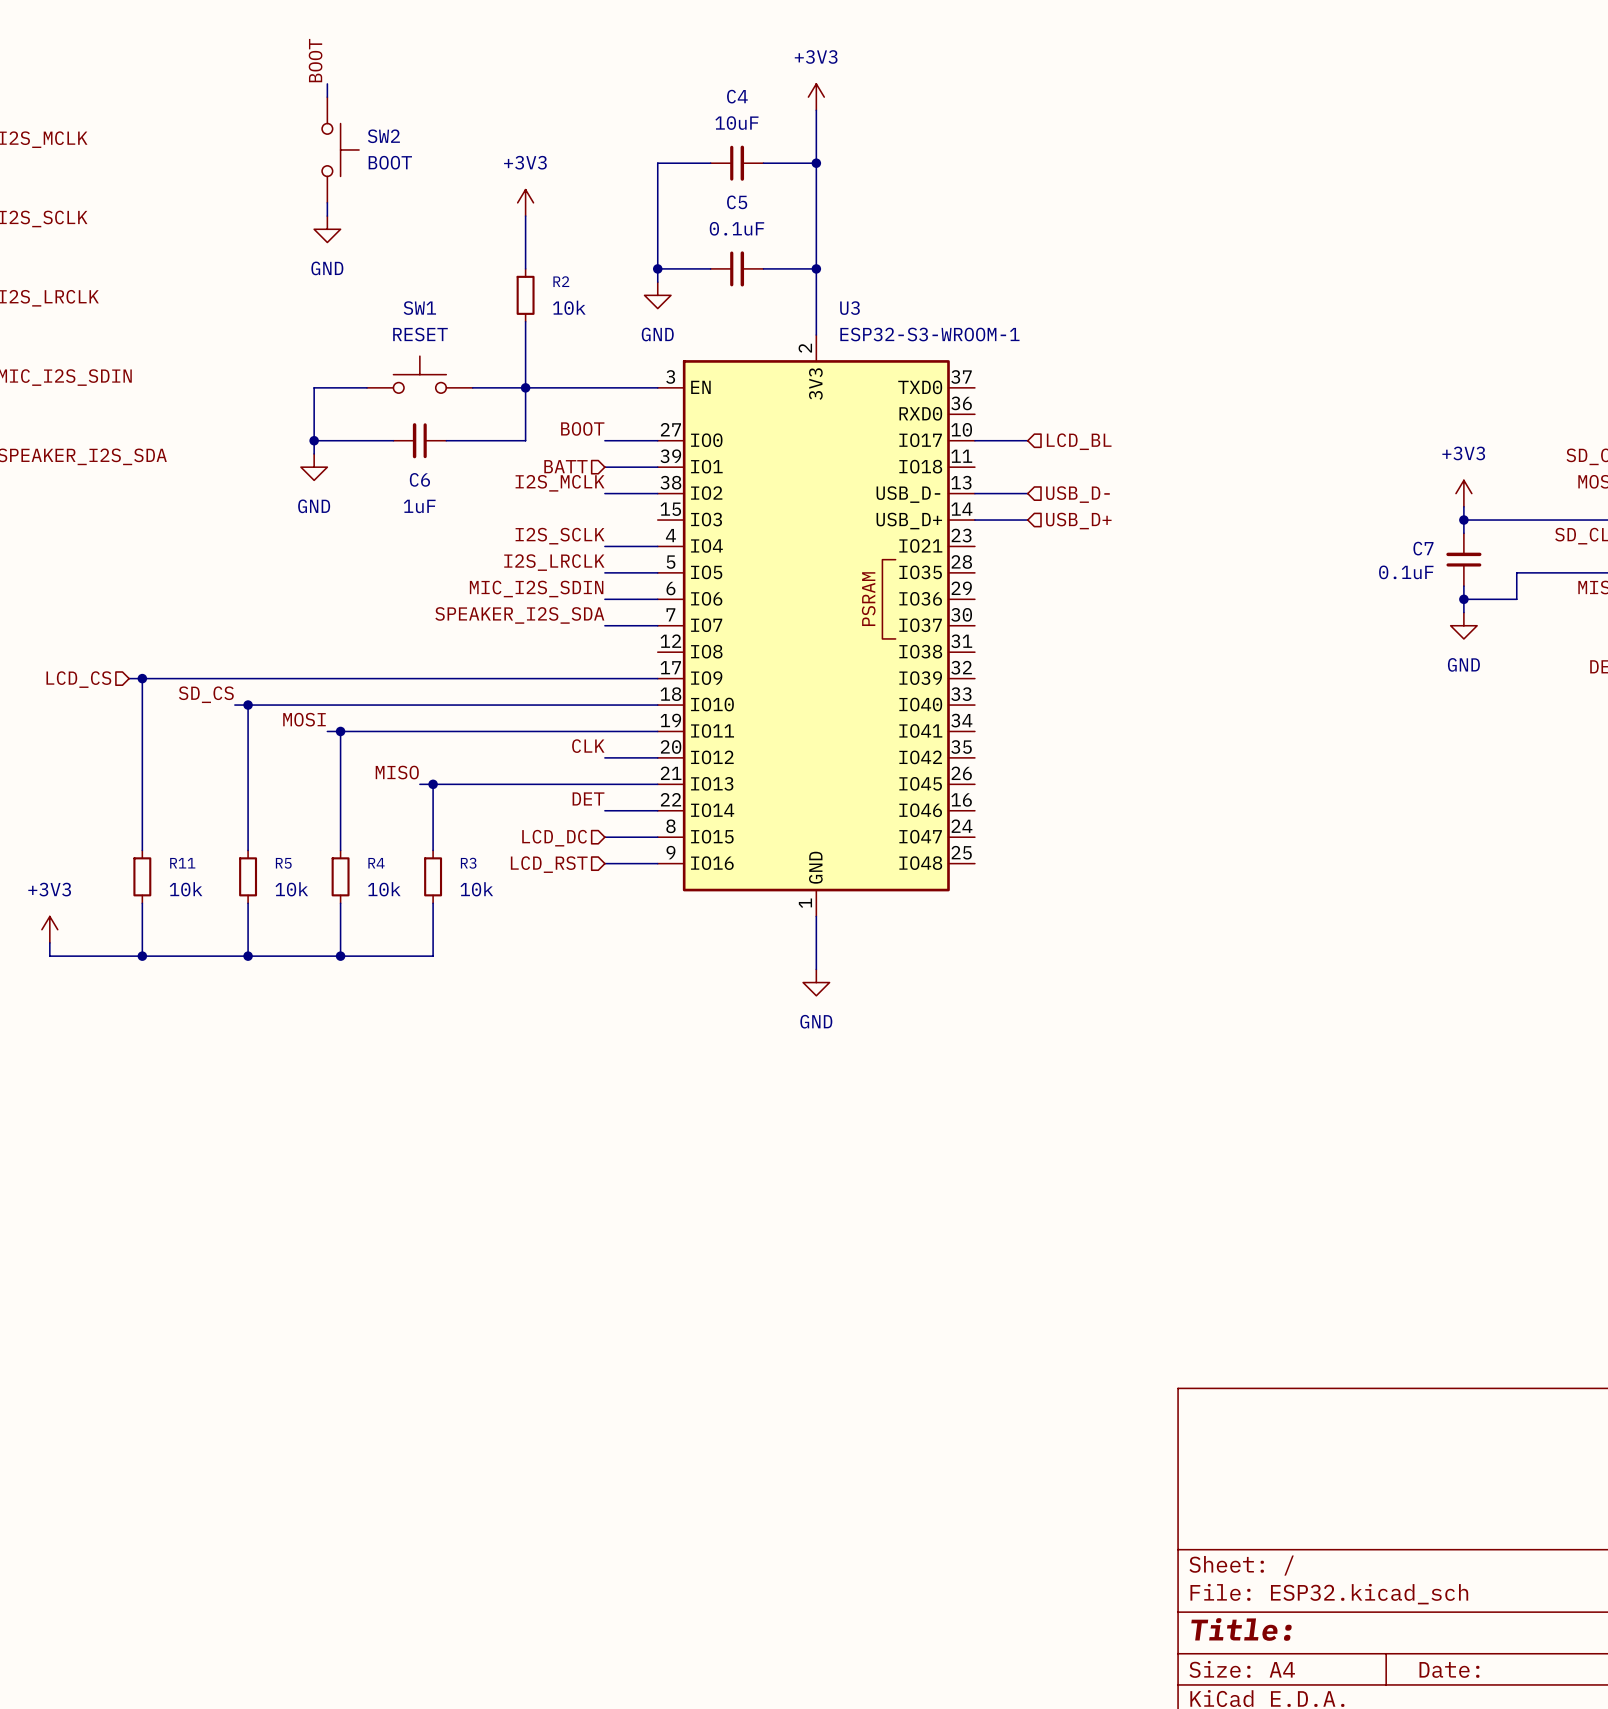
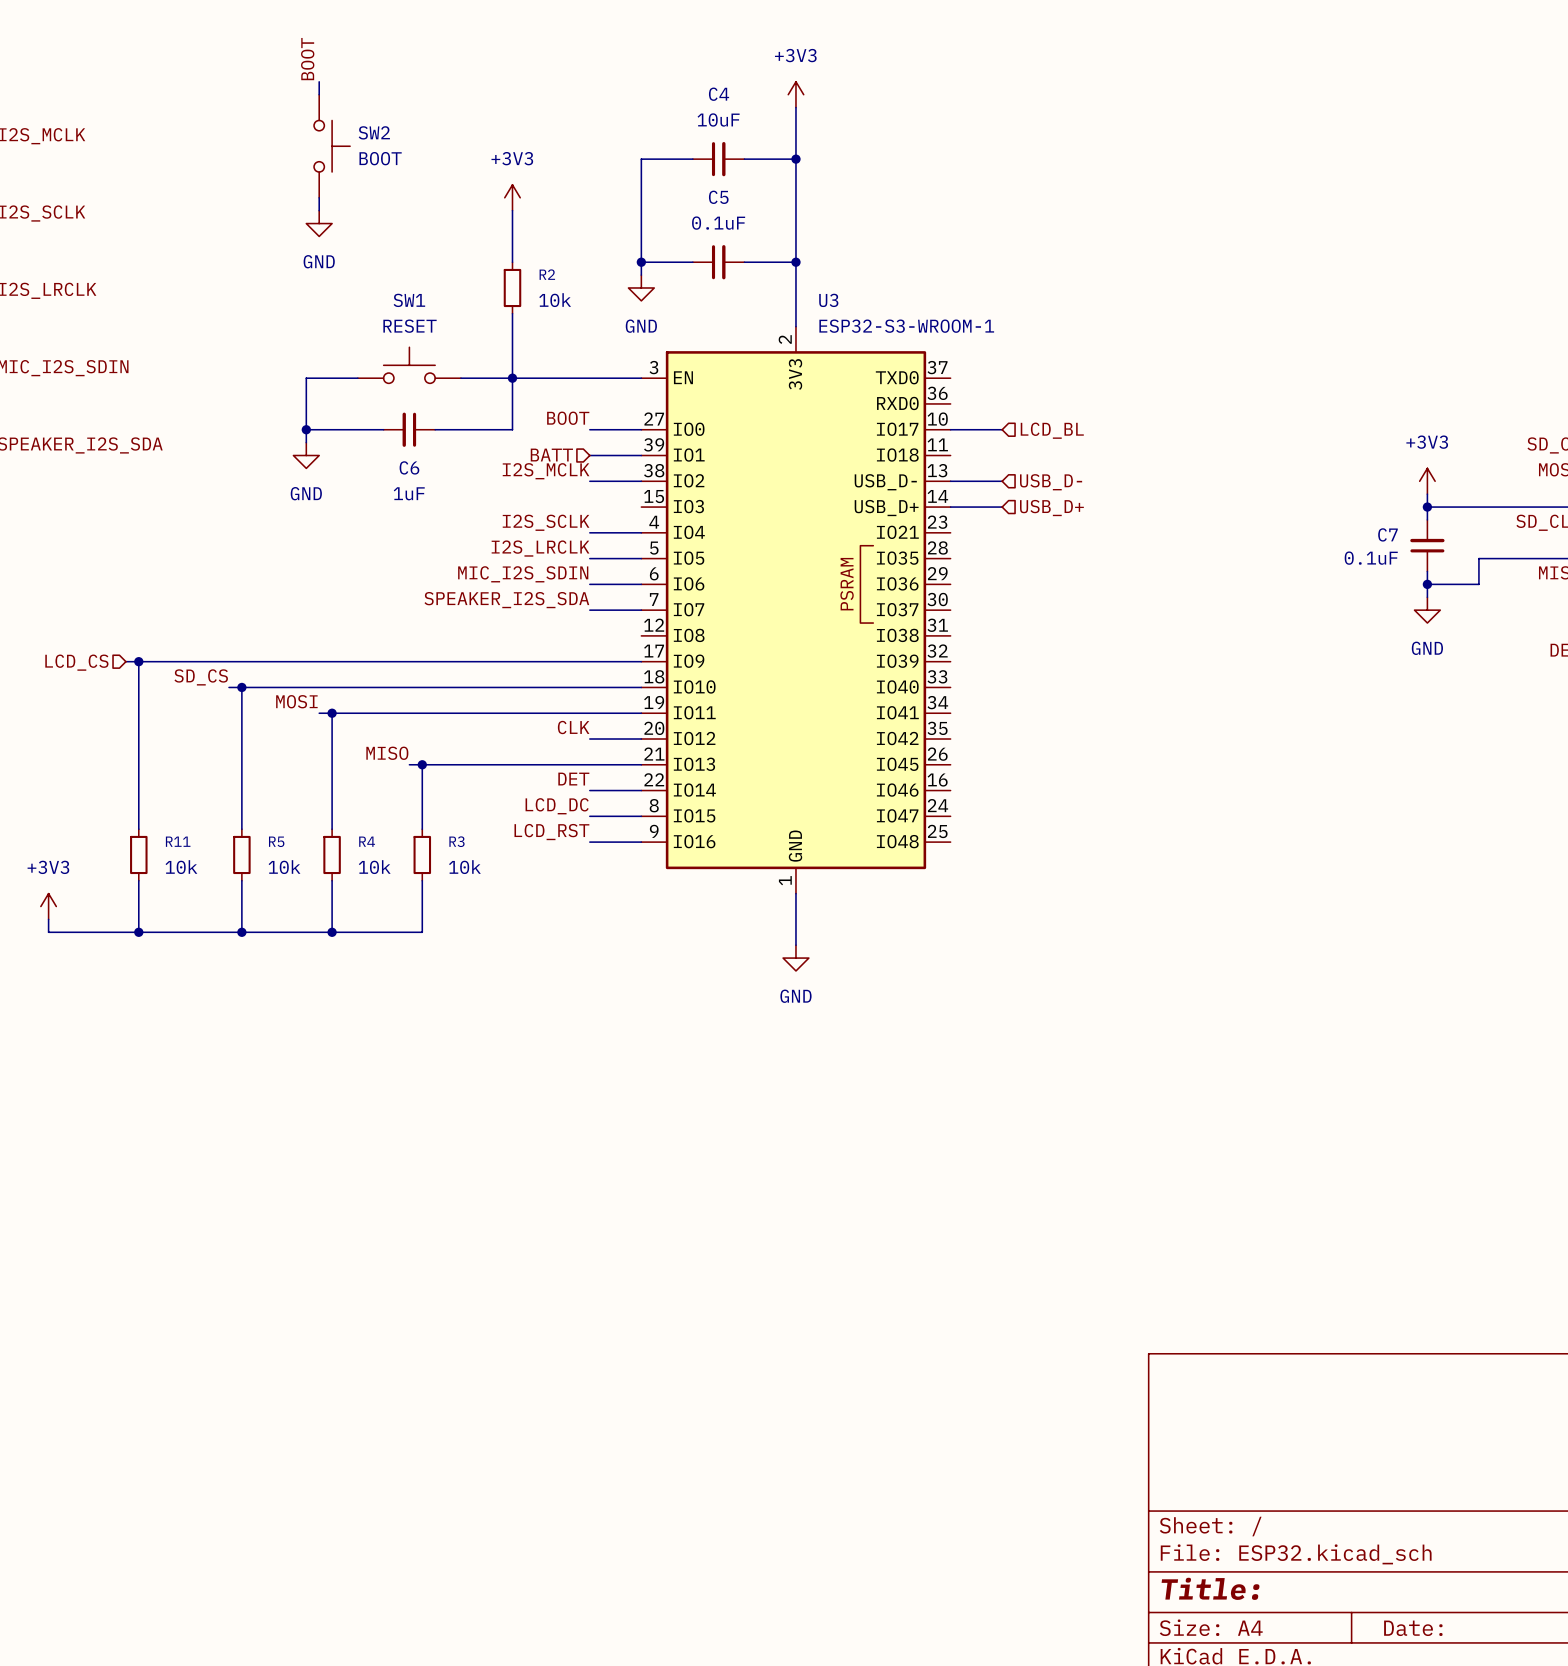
label: none -> LCD_DC (557, 806)
hierarchical label: LCD_DC (554, 838) -> none
label: none -> LCD_RST (551, 832)
hierarchical label: LCD_RST (549, 864) -> none

